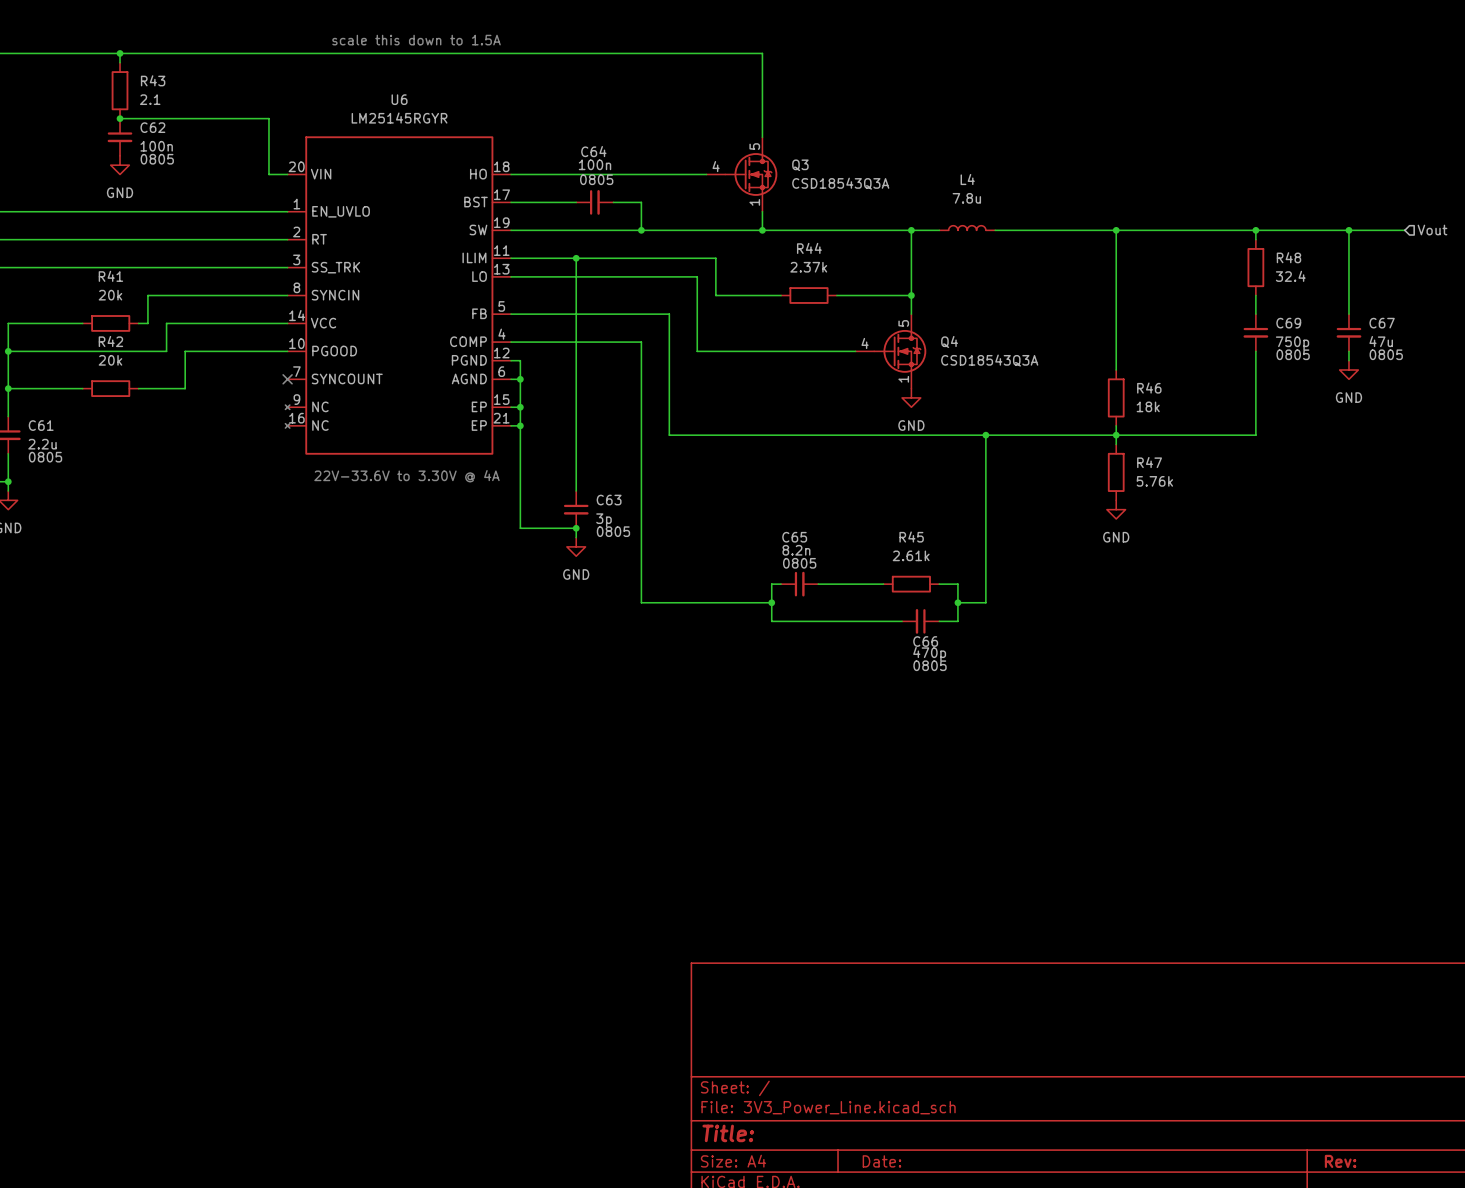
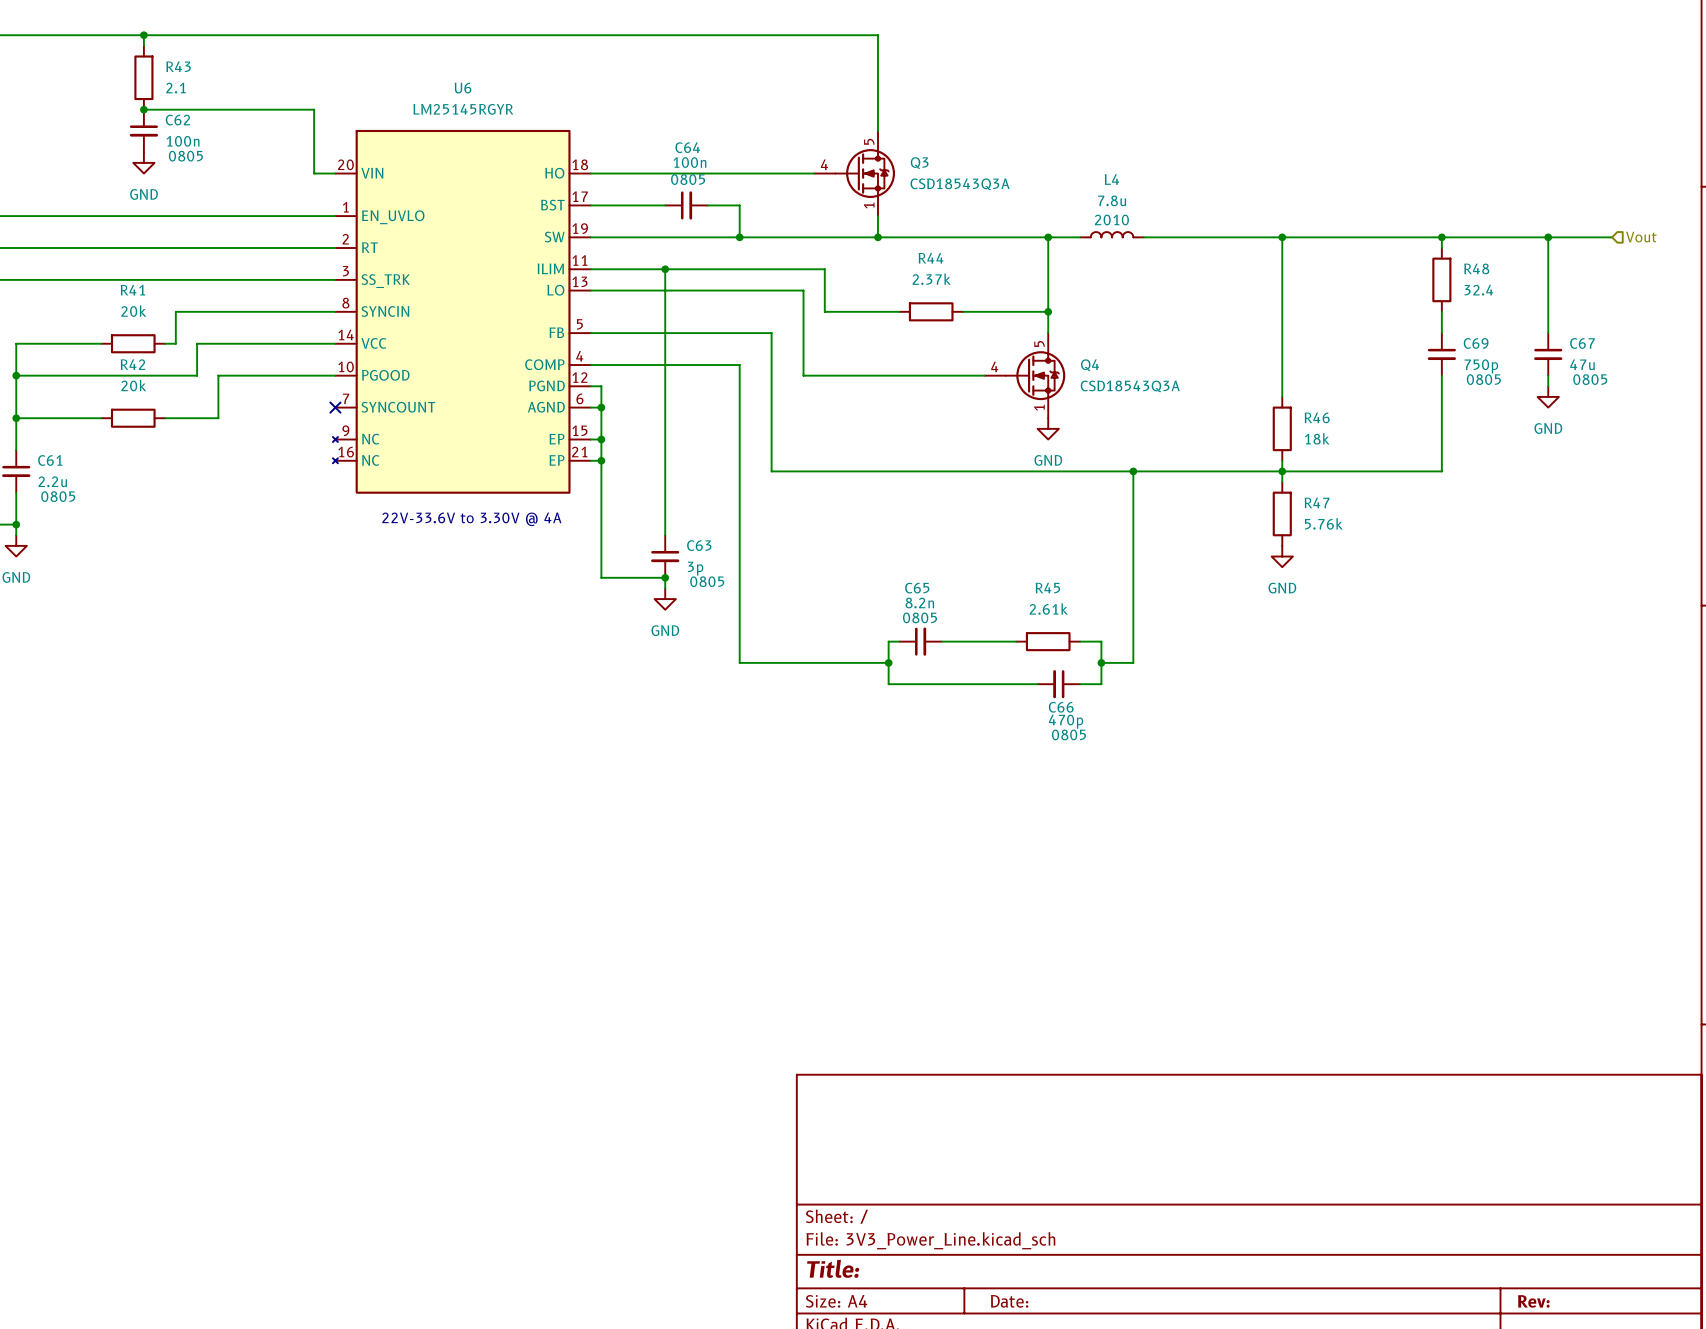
text: scale this down to 1.5A (416, 40) -> none
L4 text: none -> 2010 (1111, 219)

